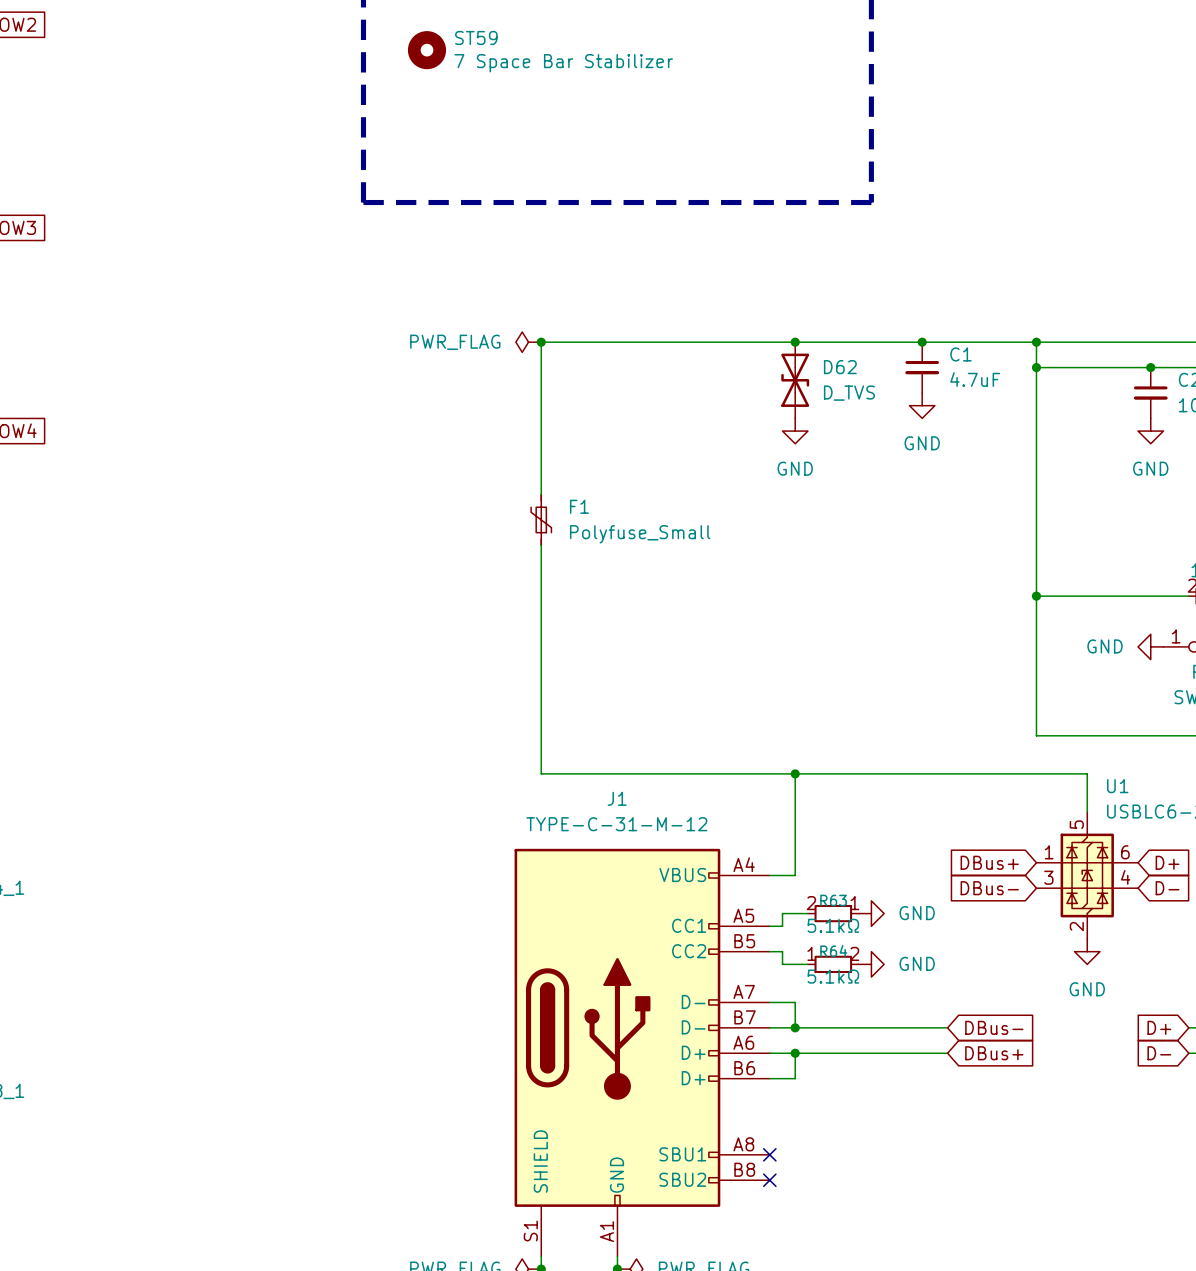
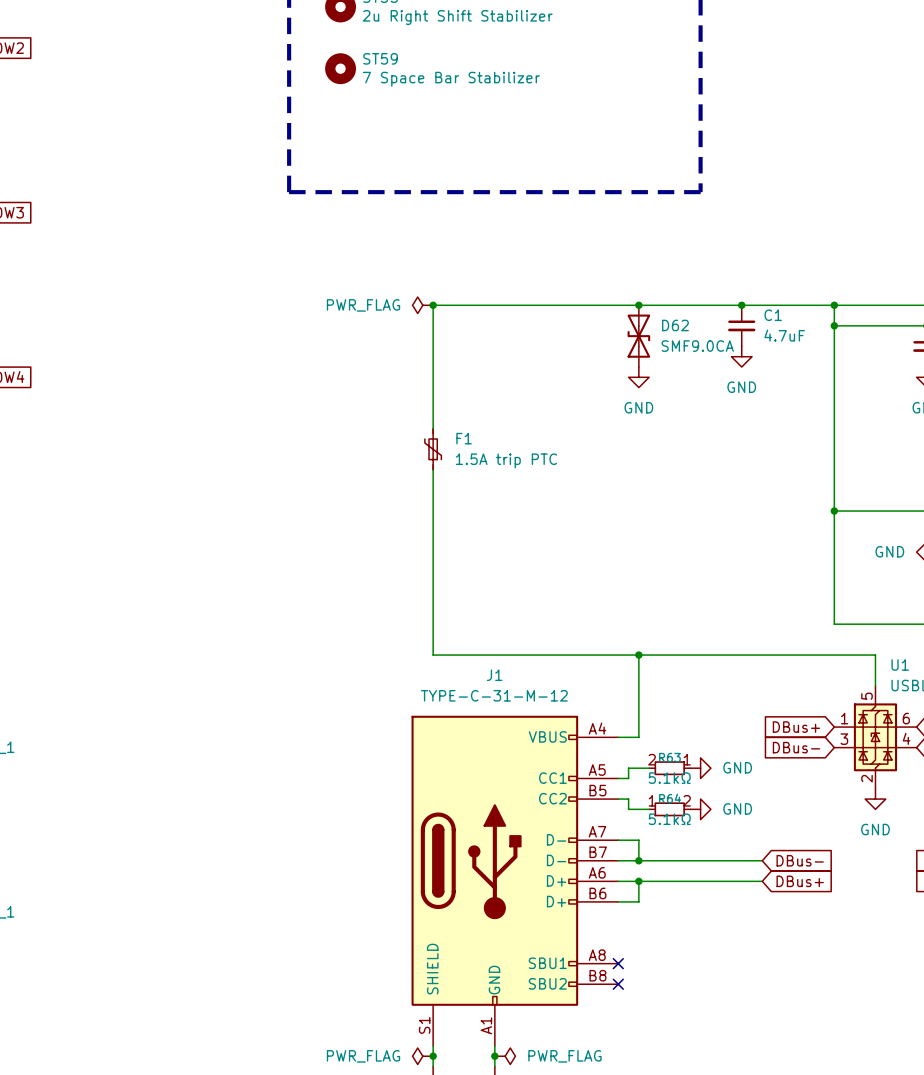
D62 value: D_TVS (849, 393) -> SMF9.0CA (697, 346)
F1 value: Polyfuse_Small (640, 534) -> 1.5A trip PTC (506, 460)

